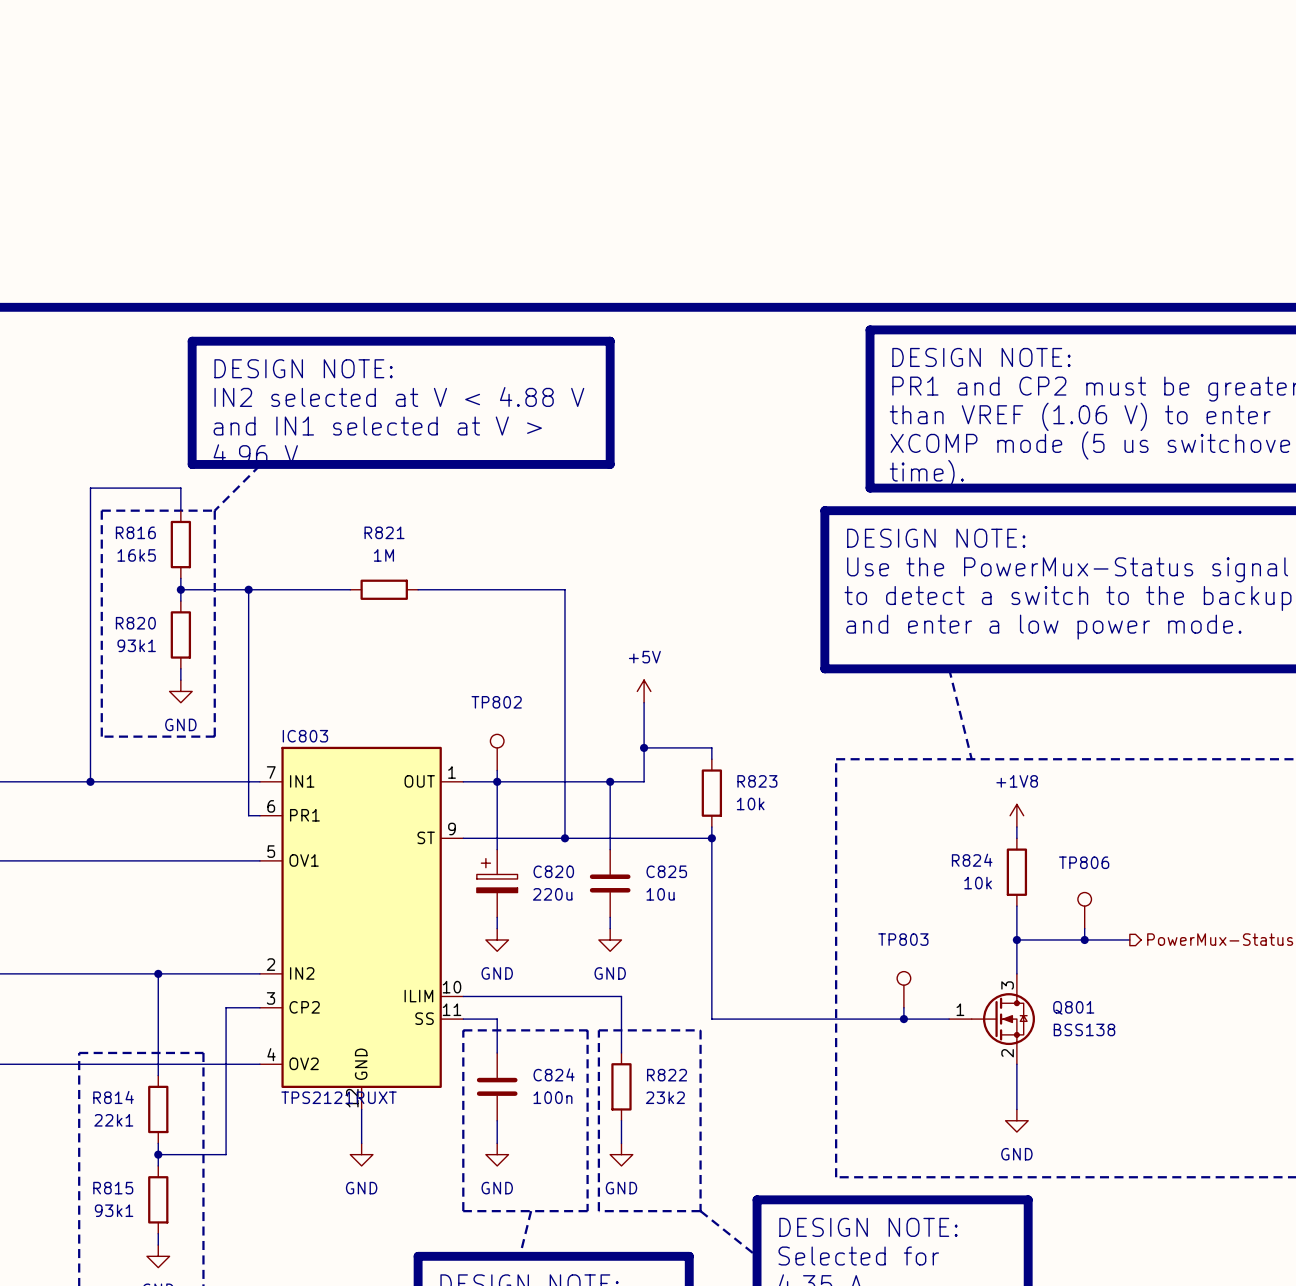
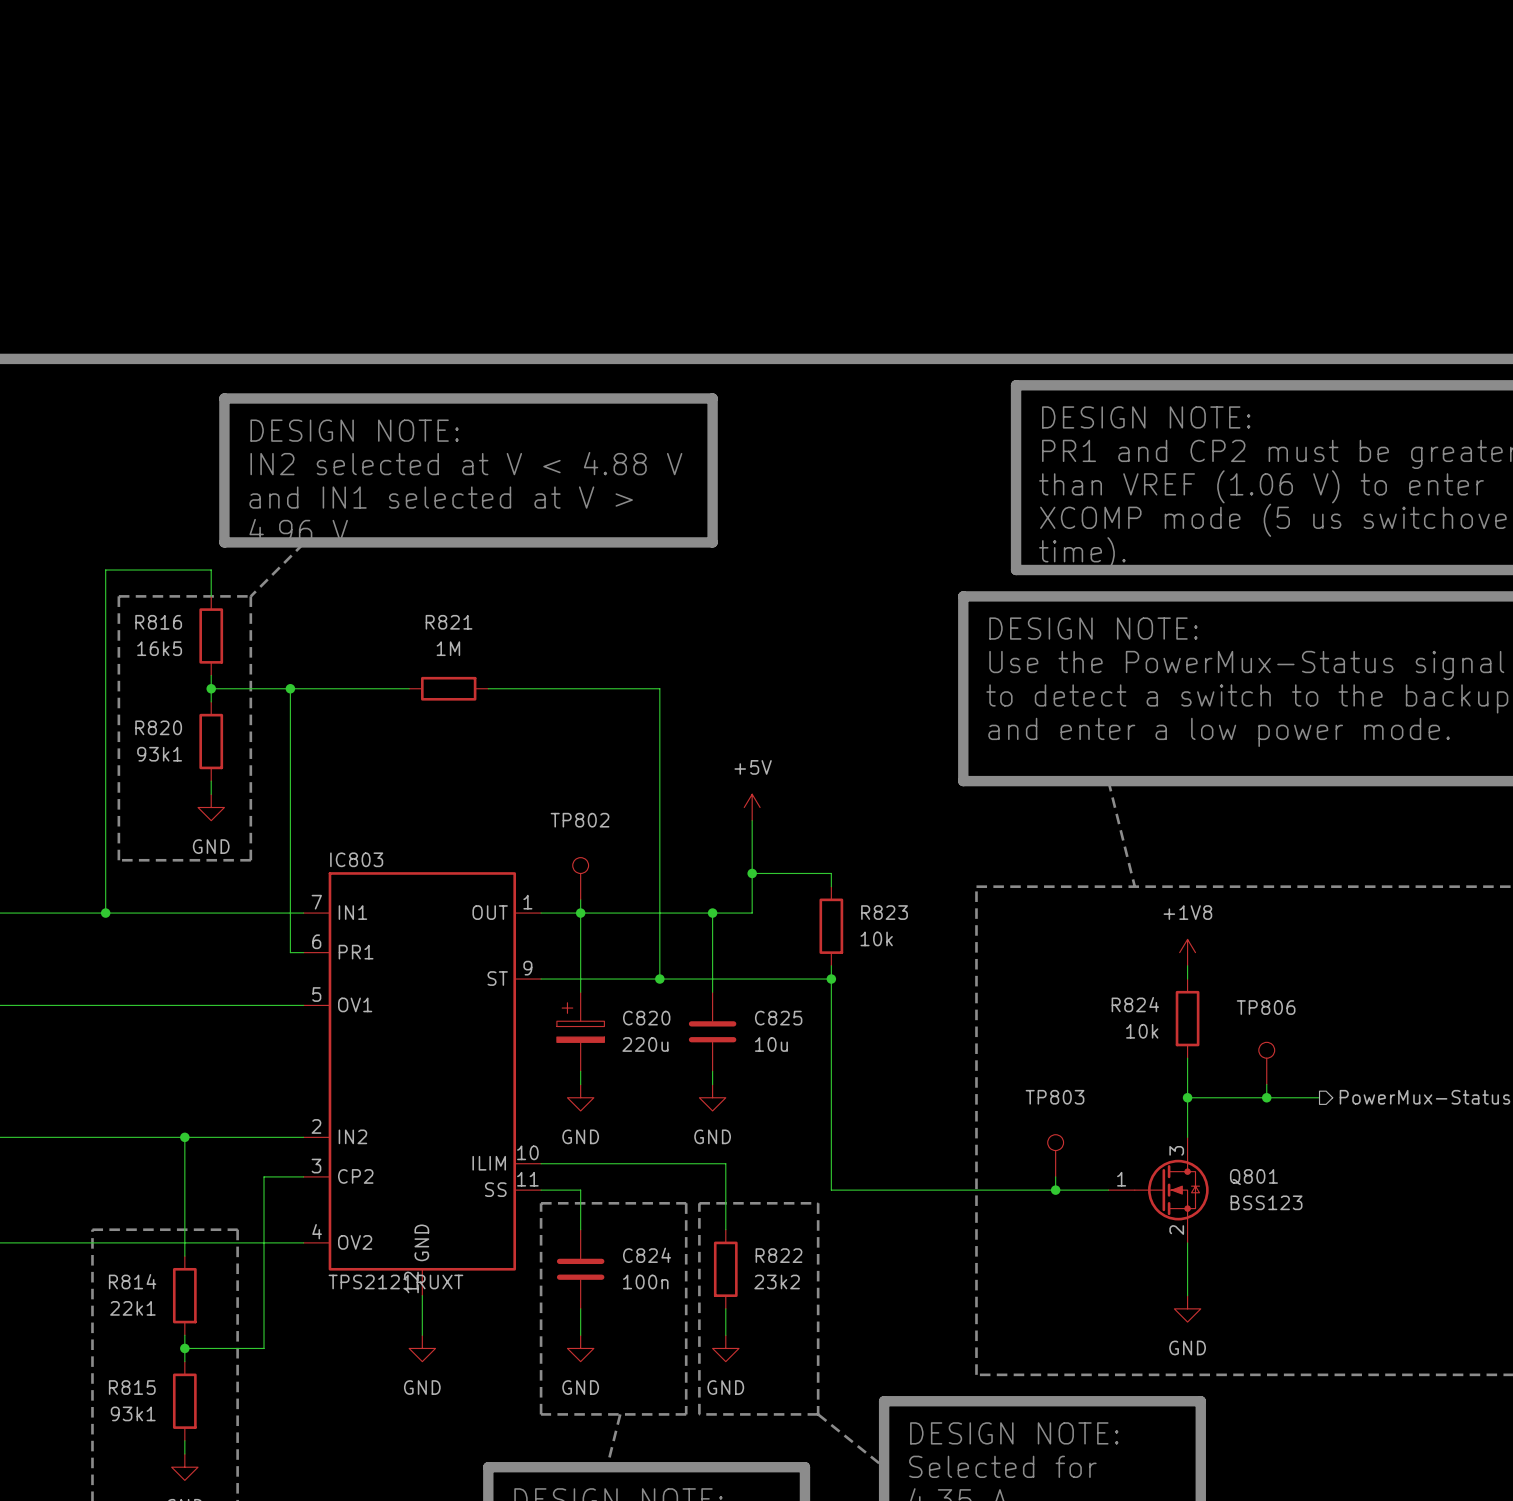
Q801 value: BSS138 (1084, 1029) -> BSS123 (1266, 1202)

